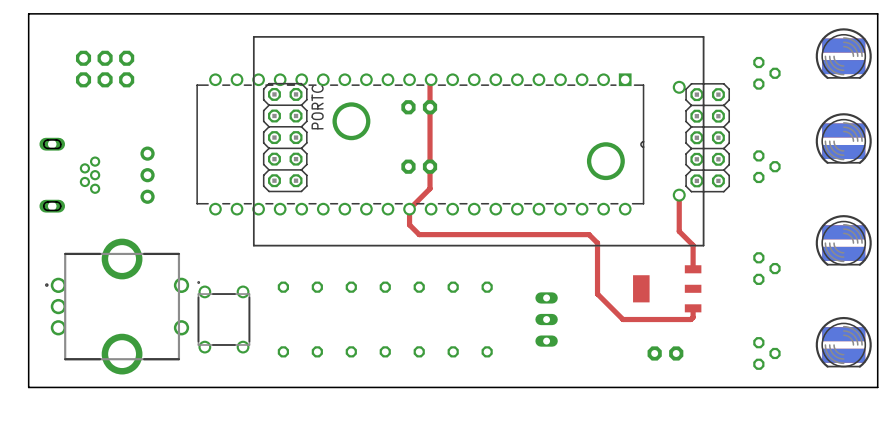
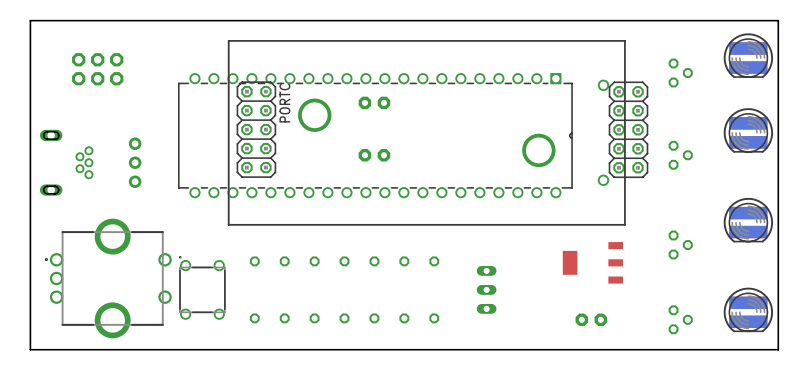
top track: (431, 79) (430, 188) (409, 209) (409, 224) (419, 234) (589, 234) (597, 243) (597, 294) (623, 319) (690, 319) (693, 317) (693, 308) -> none
top track: (679, 195) (679, 231) (693, 245) (693, 269) -> none

